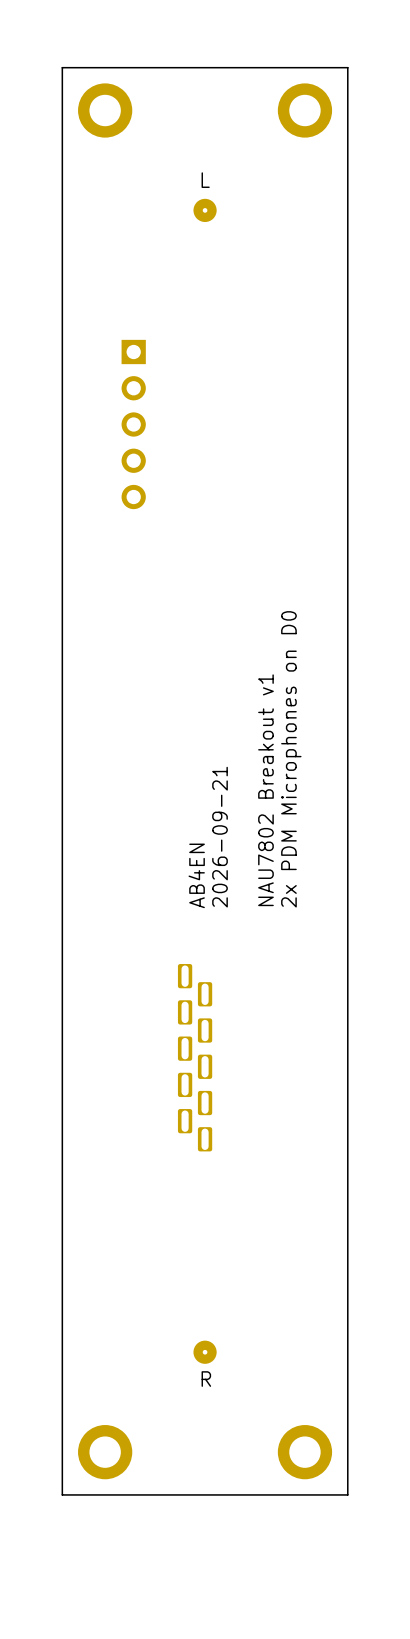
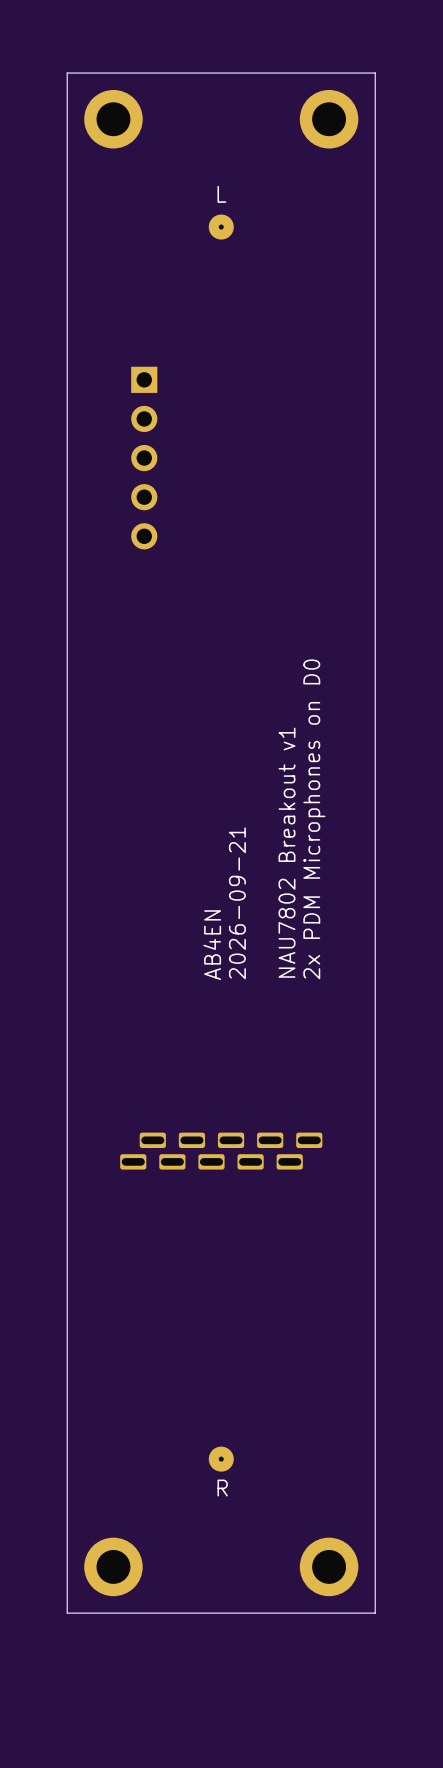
part rotation: 0° (195, 1057) -> 90° clockwise (221, 1151)

